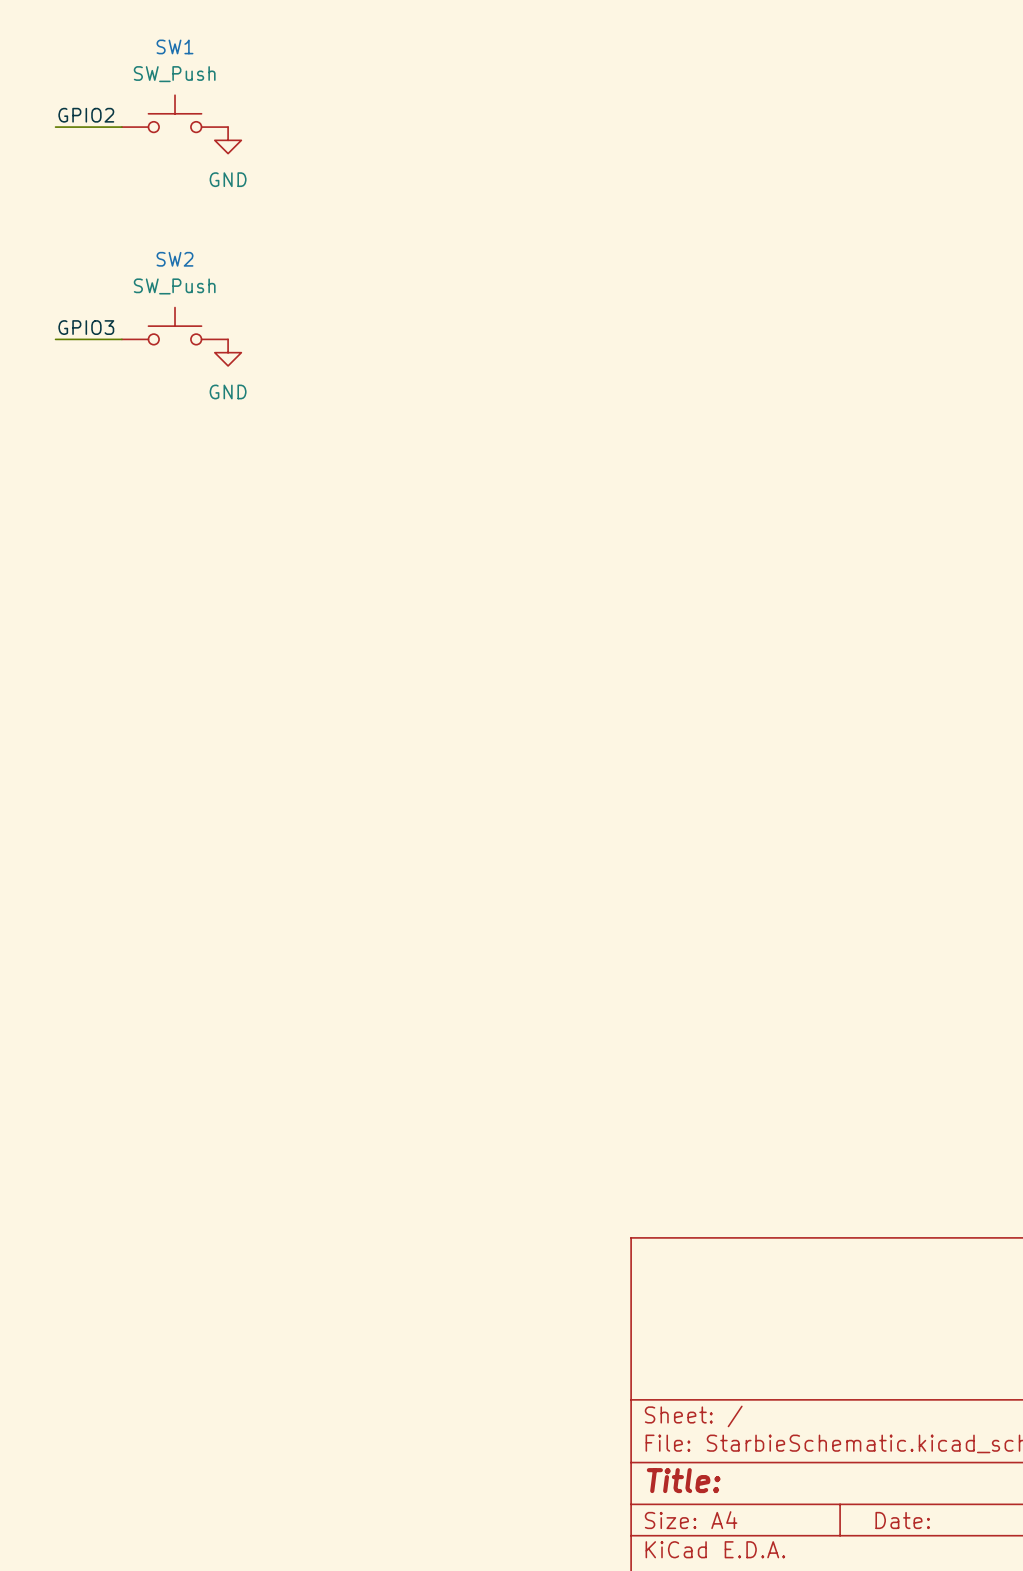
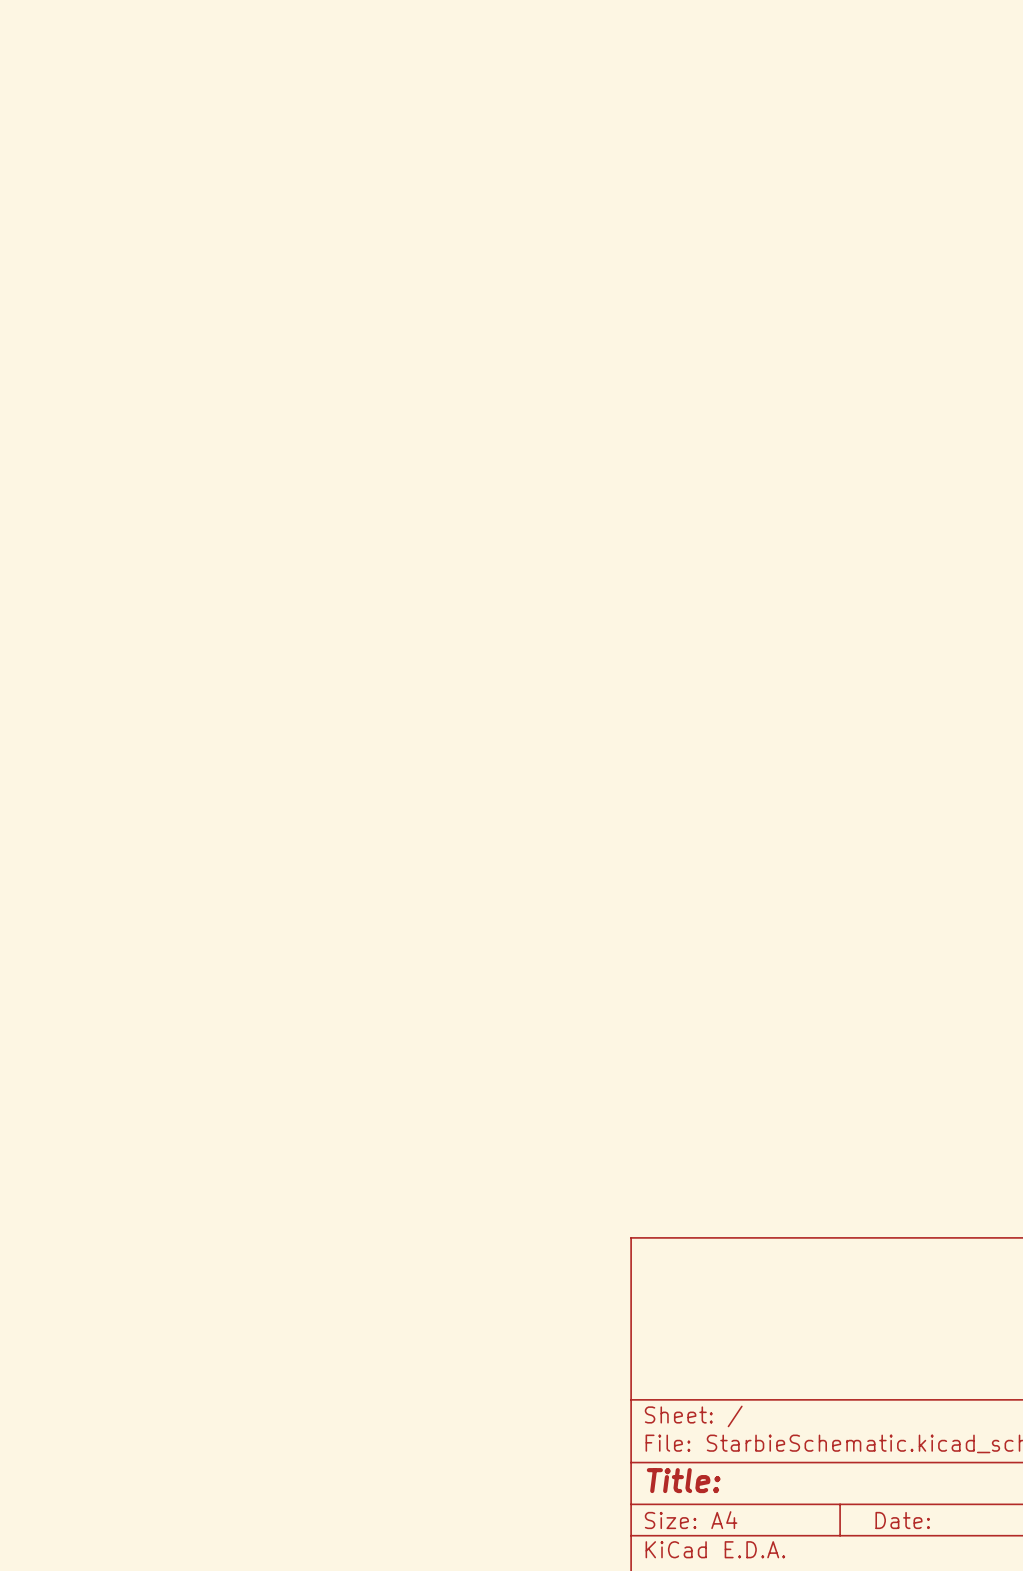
SW1: SW_Push (175, 113) -> none
label: GPIO2 (86, 115) -> none
wire: (55, 127) (121, 127) -> none
power symbol: GND (228, 140) -> none
SW2: SW_Push (175, 326) -> none
label: GPIO3 (86, 327) -> none
wire: (55, 339) (121, 339) -> none
power symbol: GND (228, 352) -> none

